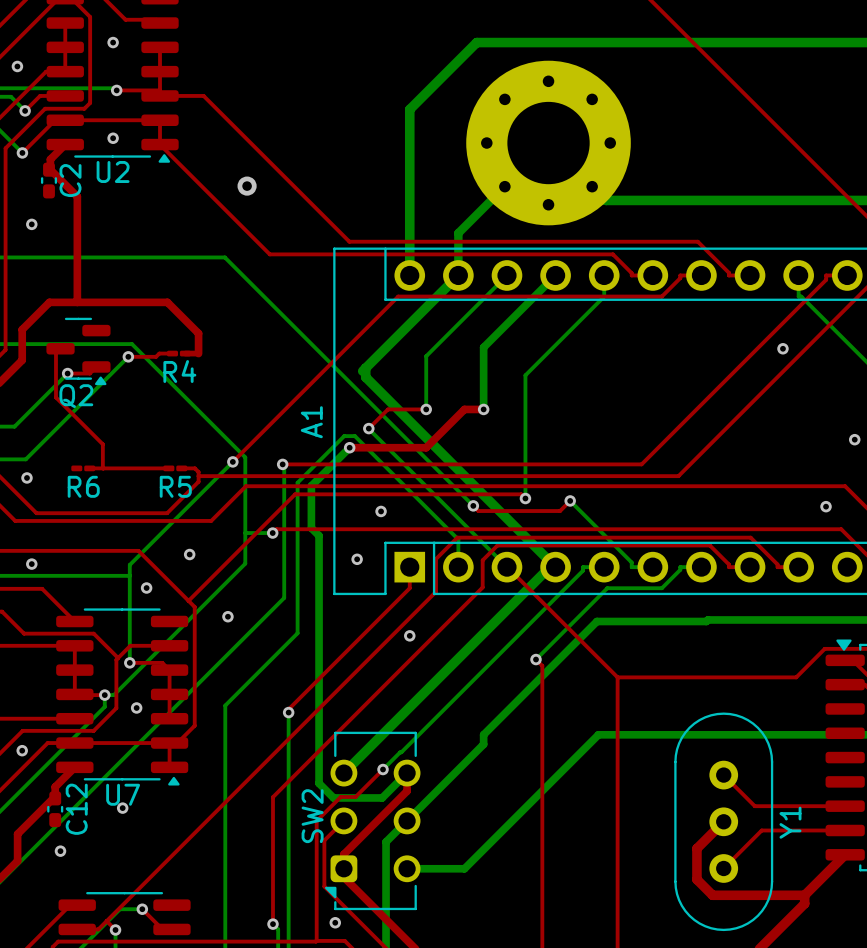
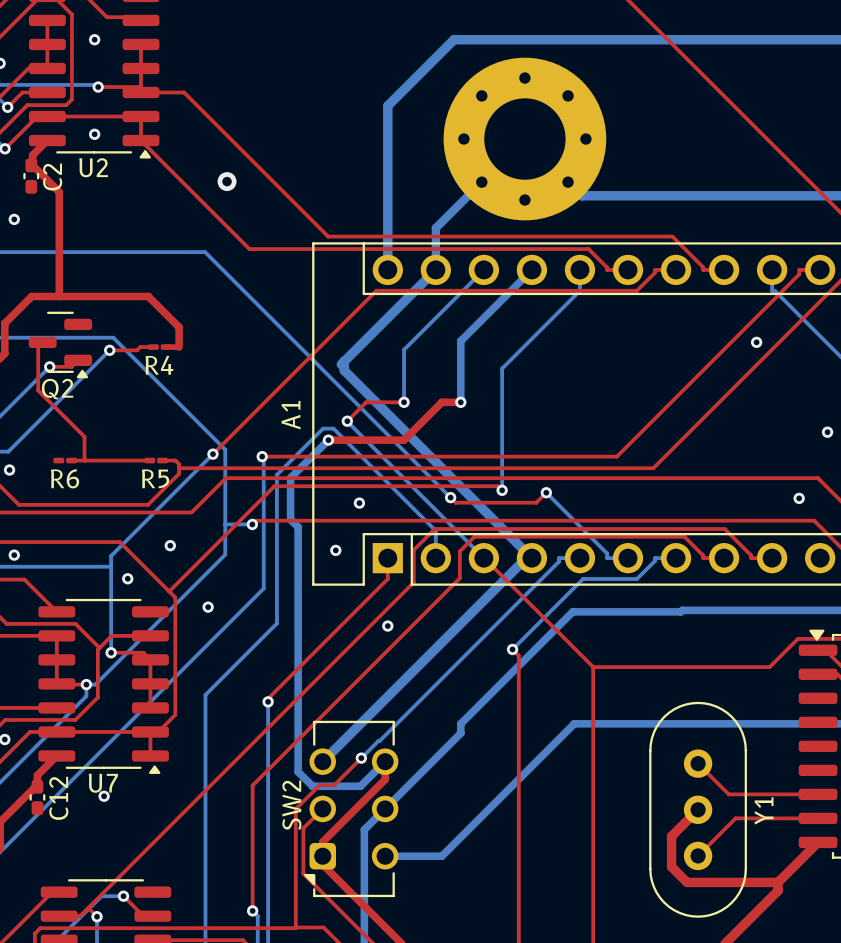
via: (136, 707) -> none
via: (60, 851) -> none
via: (335, 922) -> none

